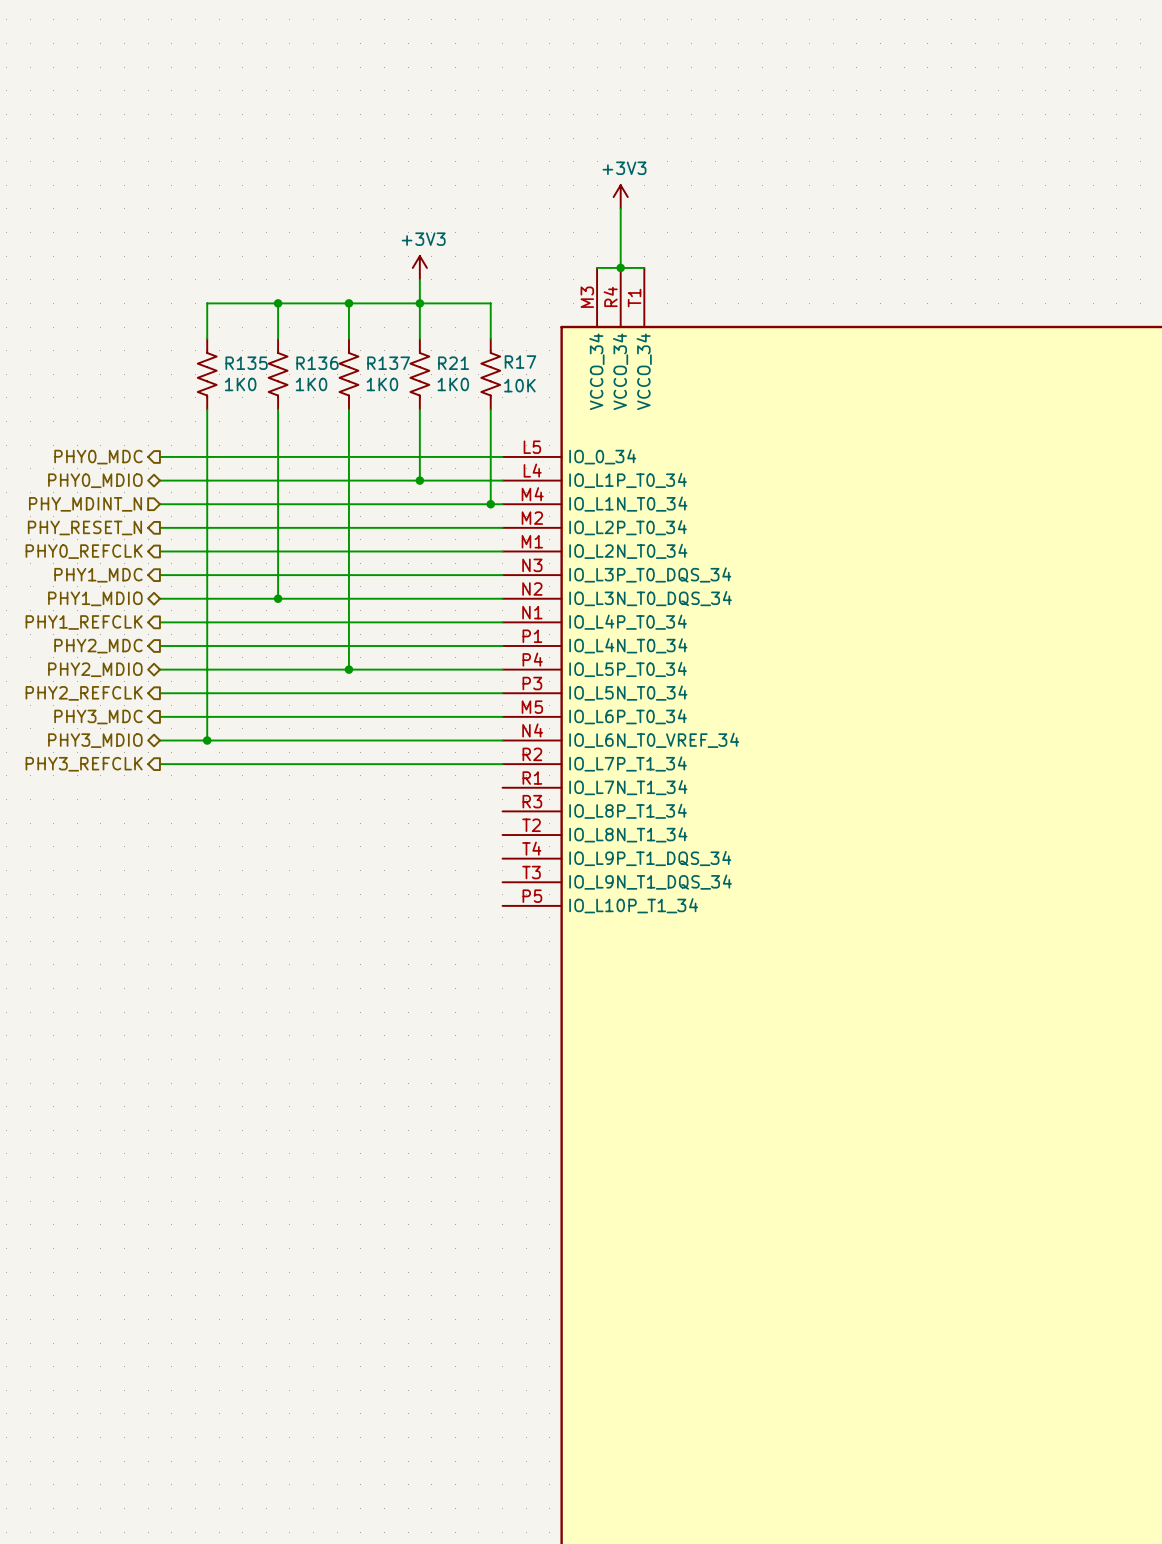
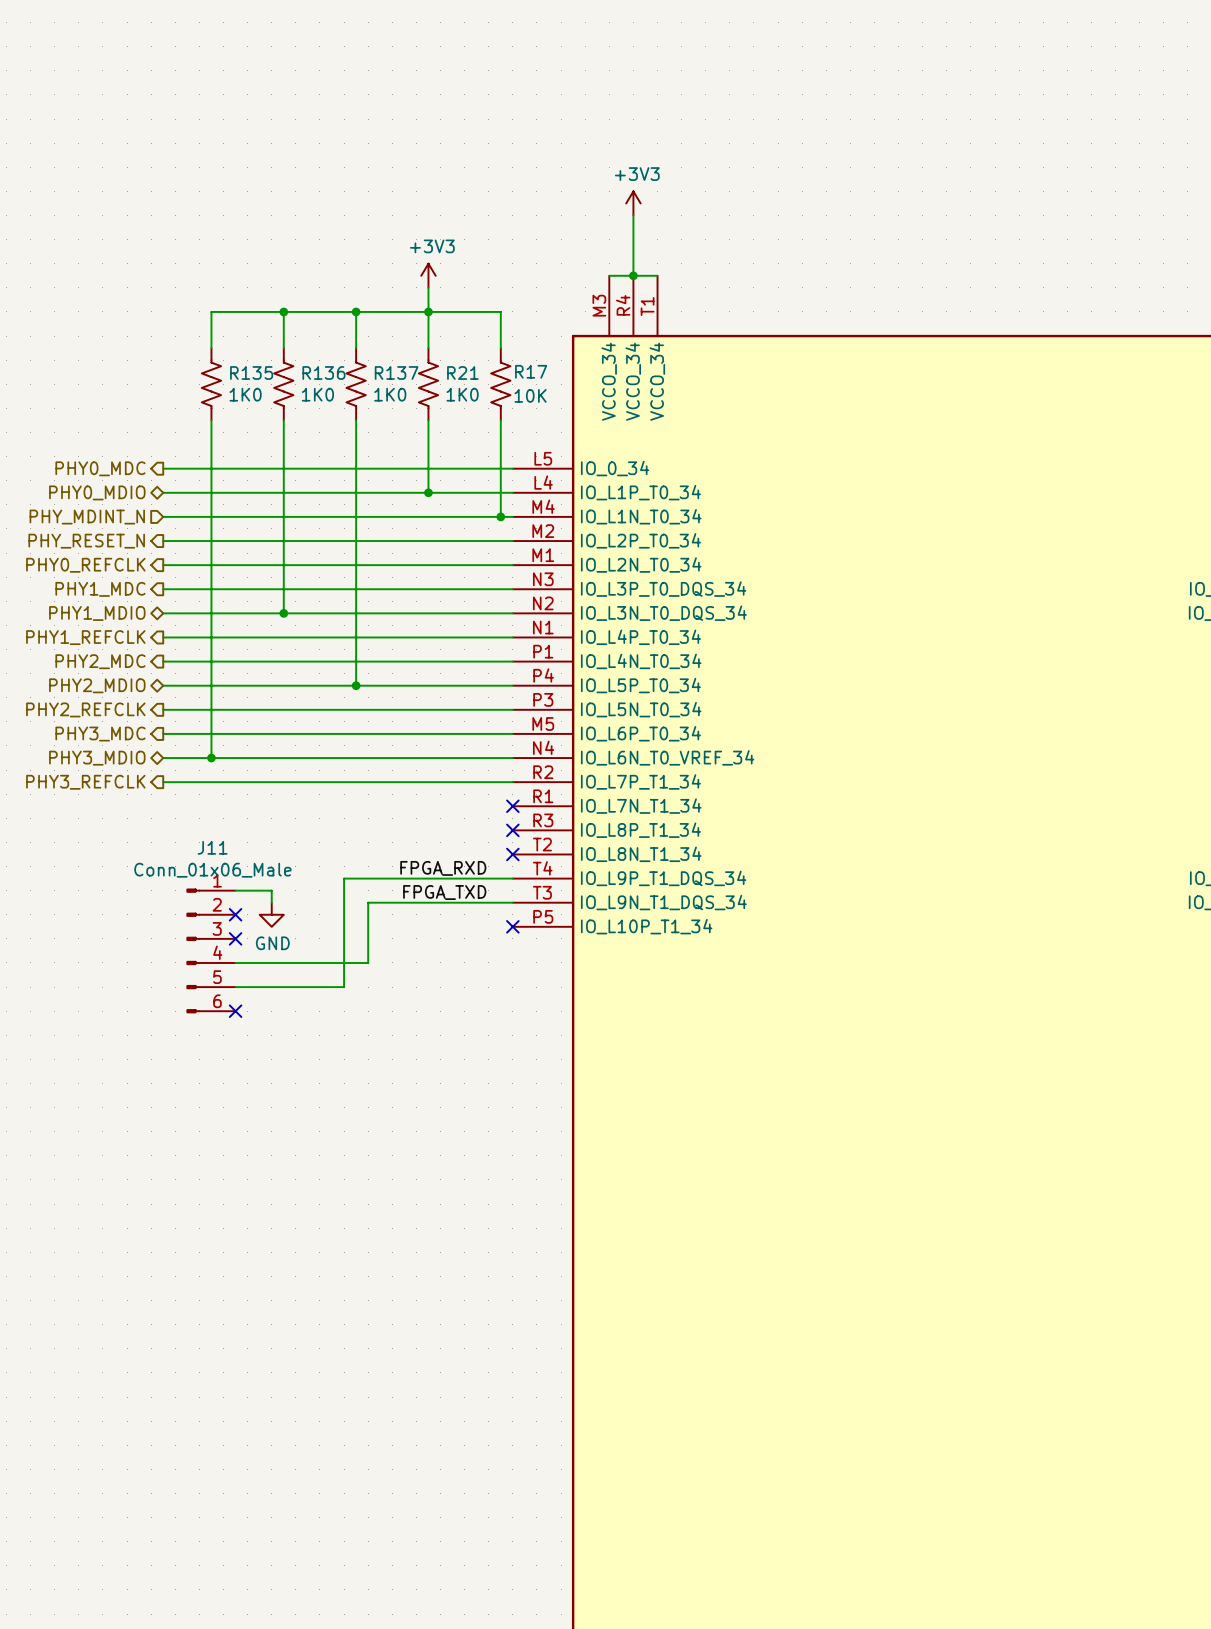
no-connect mark: none -> (512, 806)
no-connect mark: none -> (512, 830)
no-connect mark: none -> (512, 854)
label: none -> FPGA_RXD (443, 868)
wire: none -> (512, 878) (344, 878) (344, 987) (235, 987)
wire: none -> (235, 890) (271, 890) (271, 902)
label: none -> FPGA_TXD (444, 892)
wire: none -> (512, 902) (368, 902) (368, 962) (235, 962)
no-connect mark: none -> (235, 914)
power symbol: none -> GND (271, 914)
no-connect mark: none -> (512, 926)
no-connect mark: none -> (235, 938)
J11: none -> Conn_01x06_Male (211, 950)
no-connect mark: none -> (235, 1011)

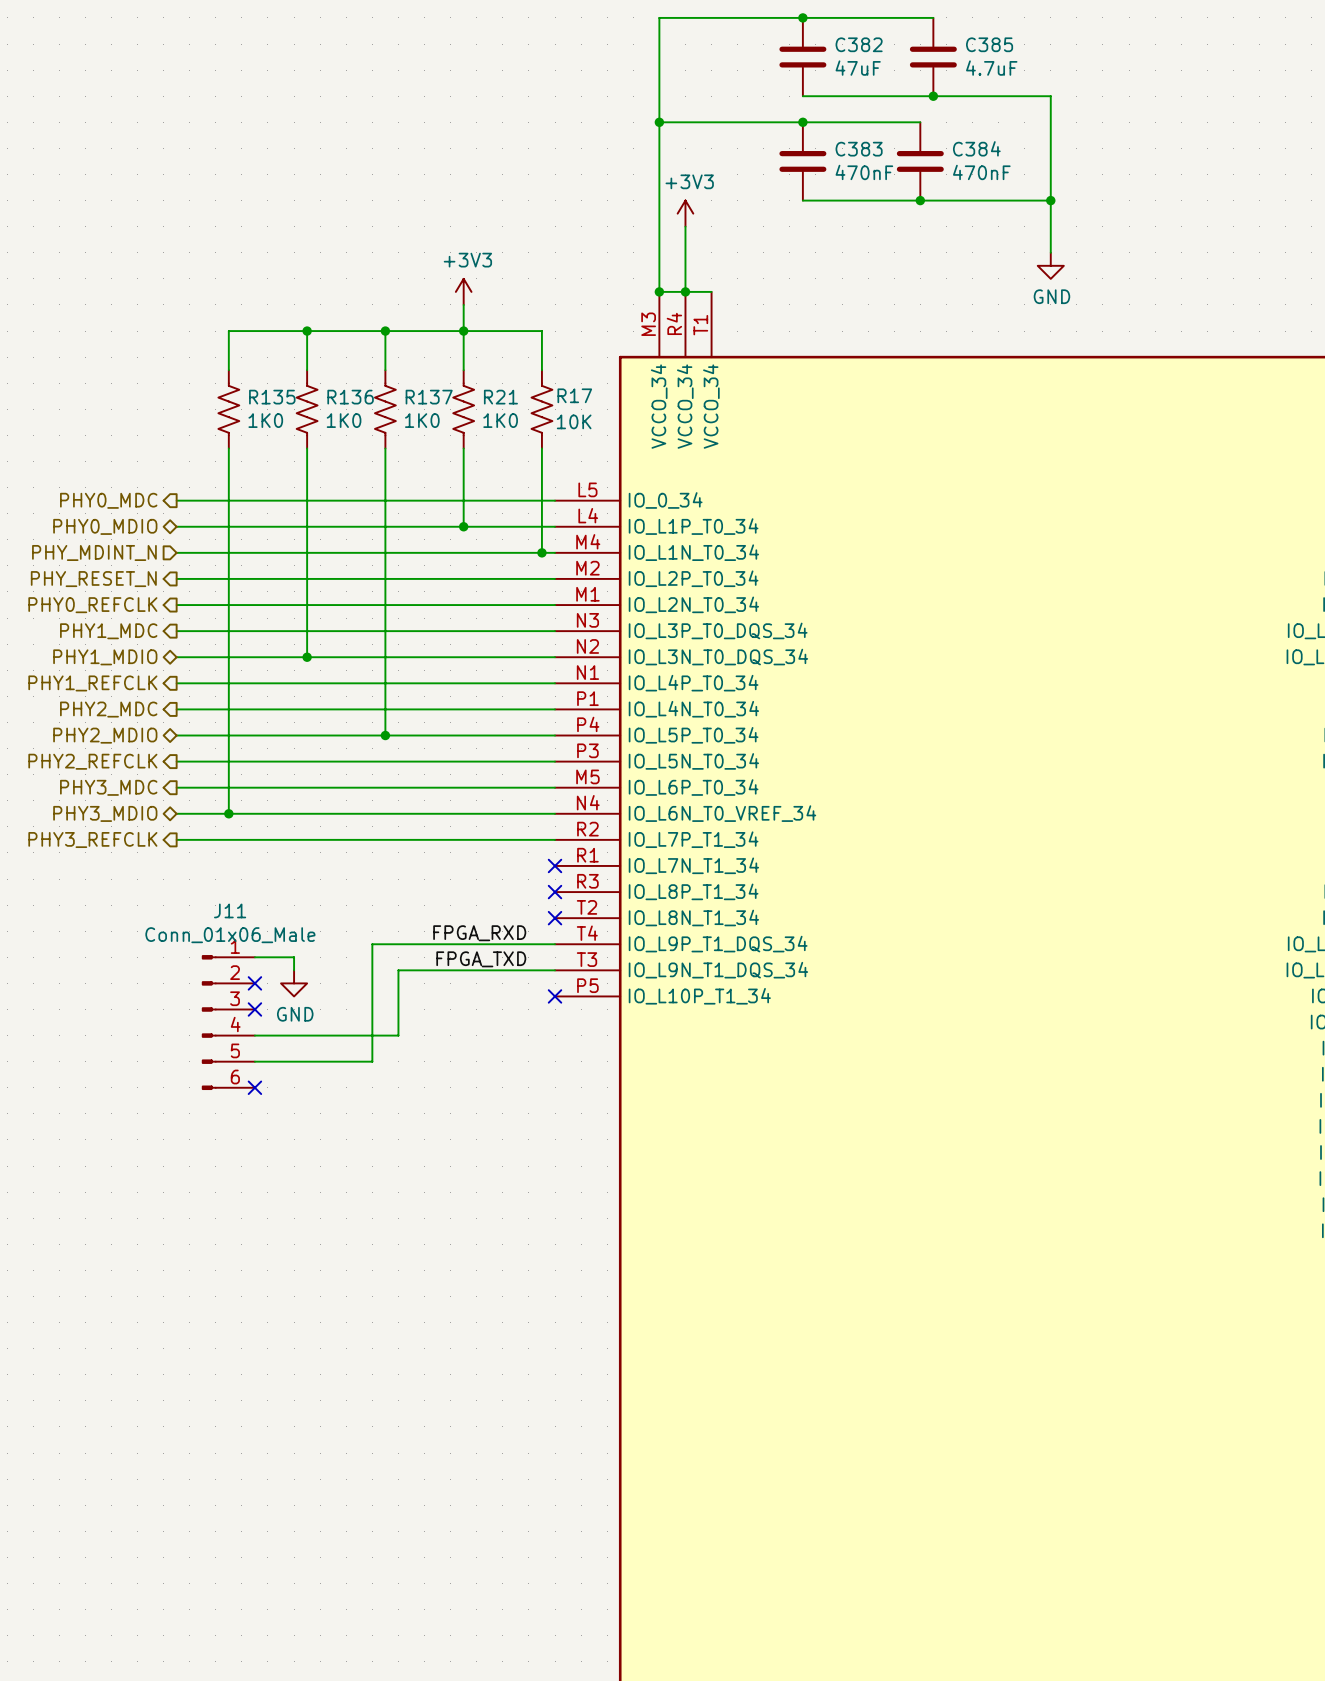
junction: none -> (802, 17)
wire: none -> (933, 17) (659, 17) (659, 291)
C382: none -> 47uF (802, 57)
C385: none -> 4.7uF (933, 57)
wire: none -> (802, 96) (1050, 96) (1050, 252)
junction: none -> (933, 96)
wire: none -> (659, 122) (920, 122)
junction: none -> (659, 122)
junction: none -> (802, 122)
C383: none -> 470nF (802, 161)
C384: none -> 470nF (920, 161)
wire: none -> (802, 200) (1050, 200)
junction: none -> (920, 200)
junction: none -> (1050, 200)
power symbol: none -> GND (1050, 265)
junction: none -> (659, 291)

